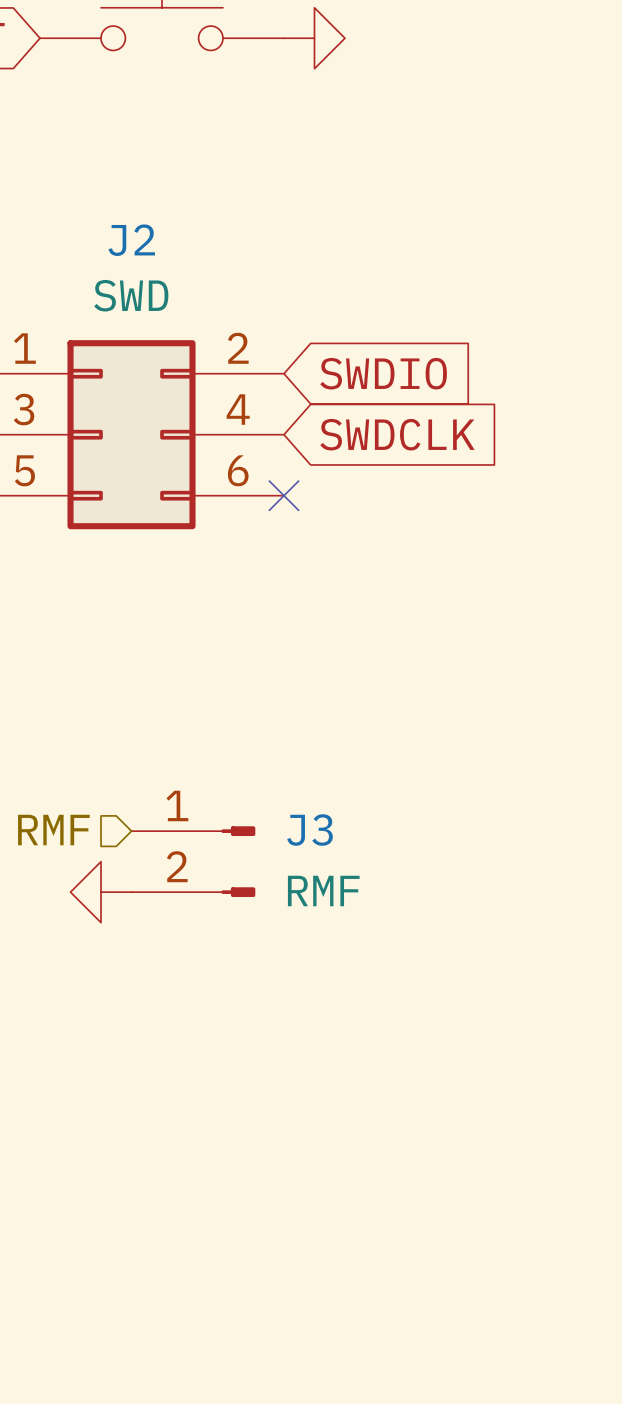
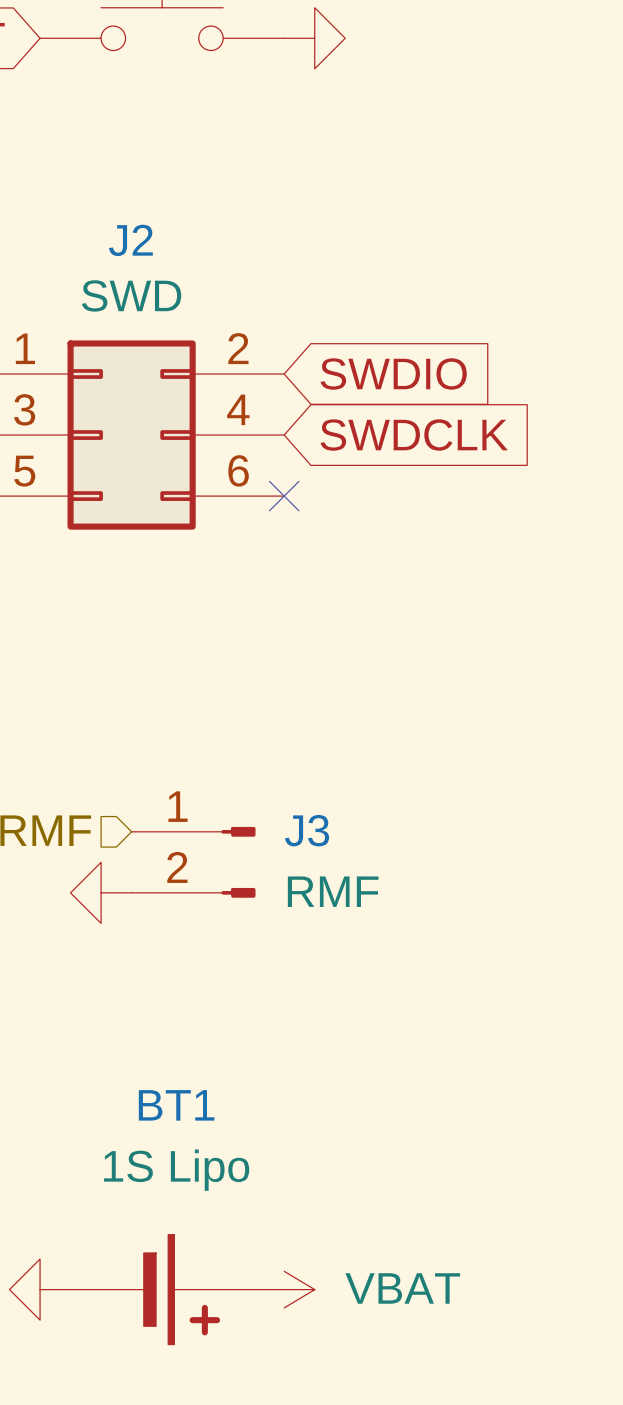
power symbol: none -> (40, 1289)
BT1: none -> 1S Lipo (162, 1289)
power symbol: none -> VBAT (284, 1289)

